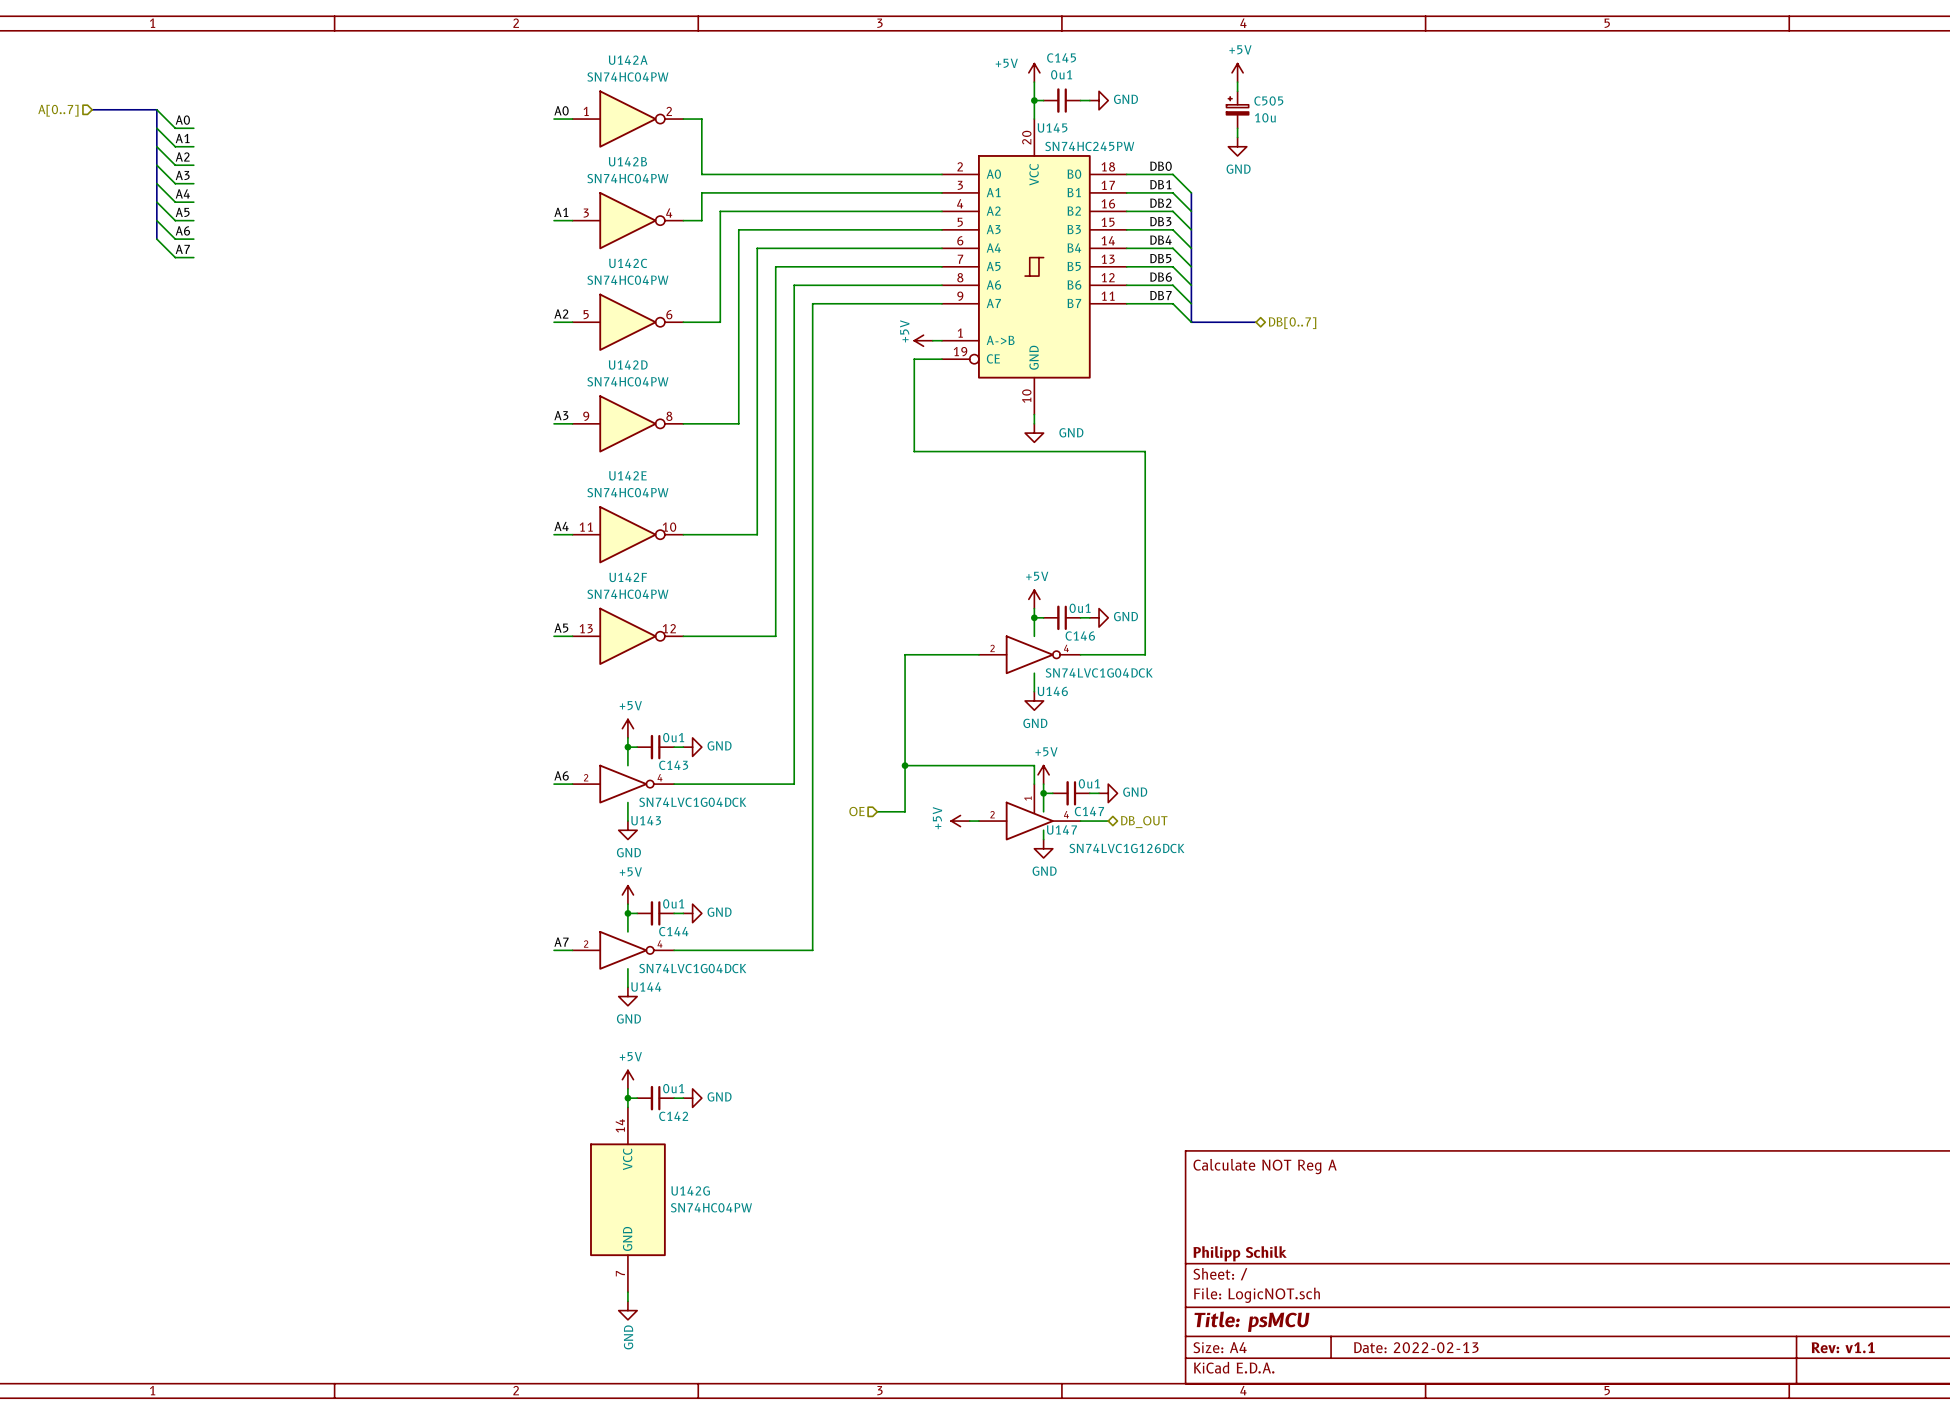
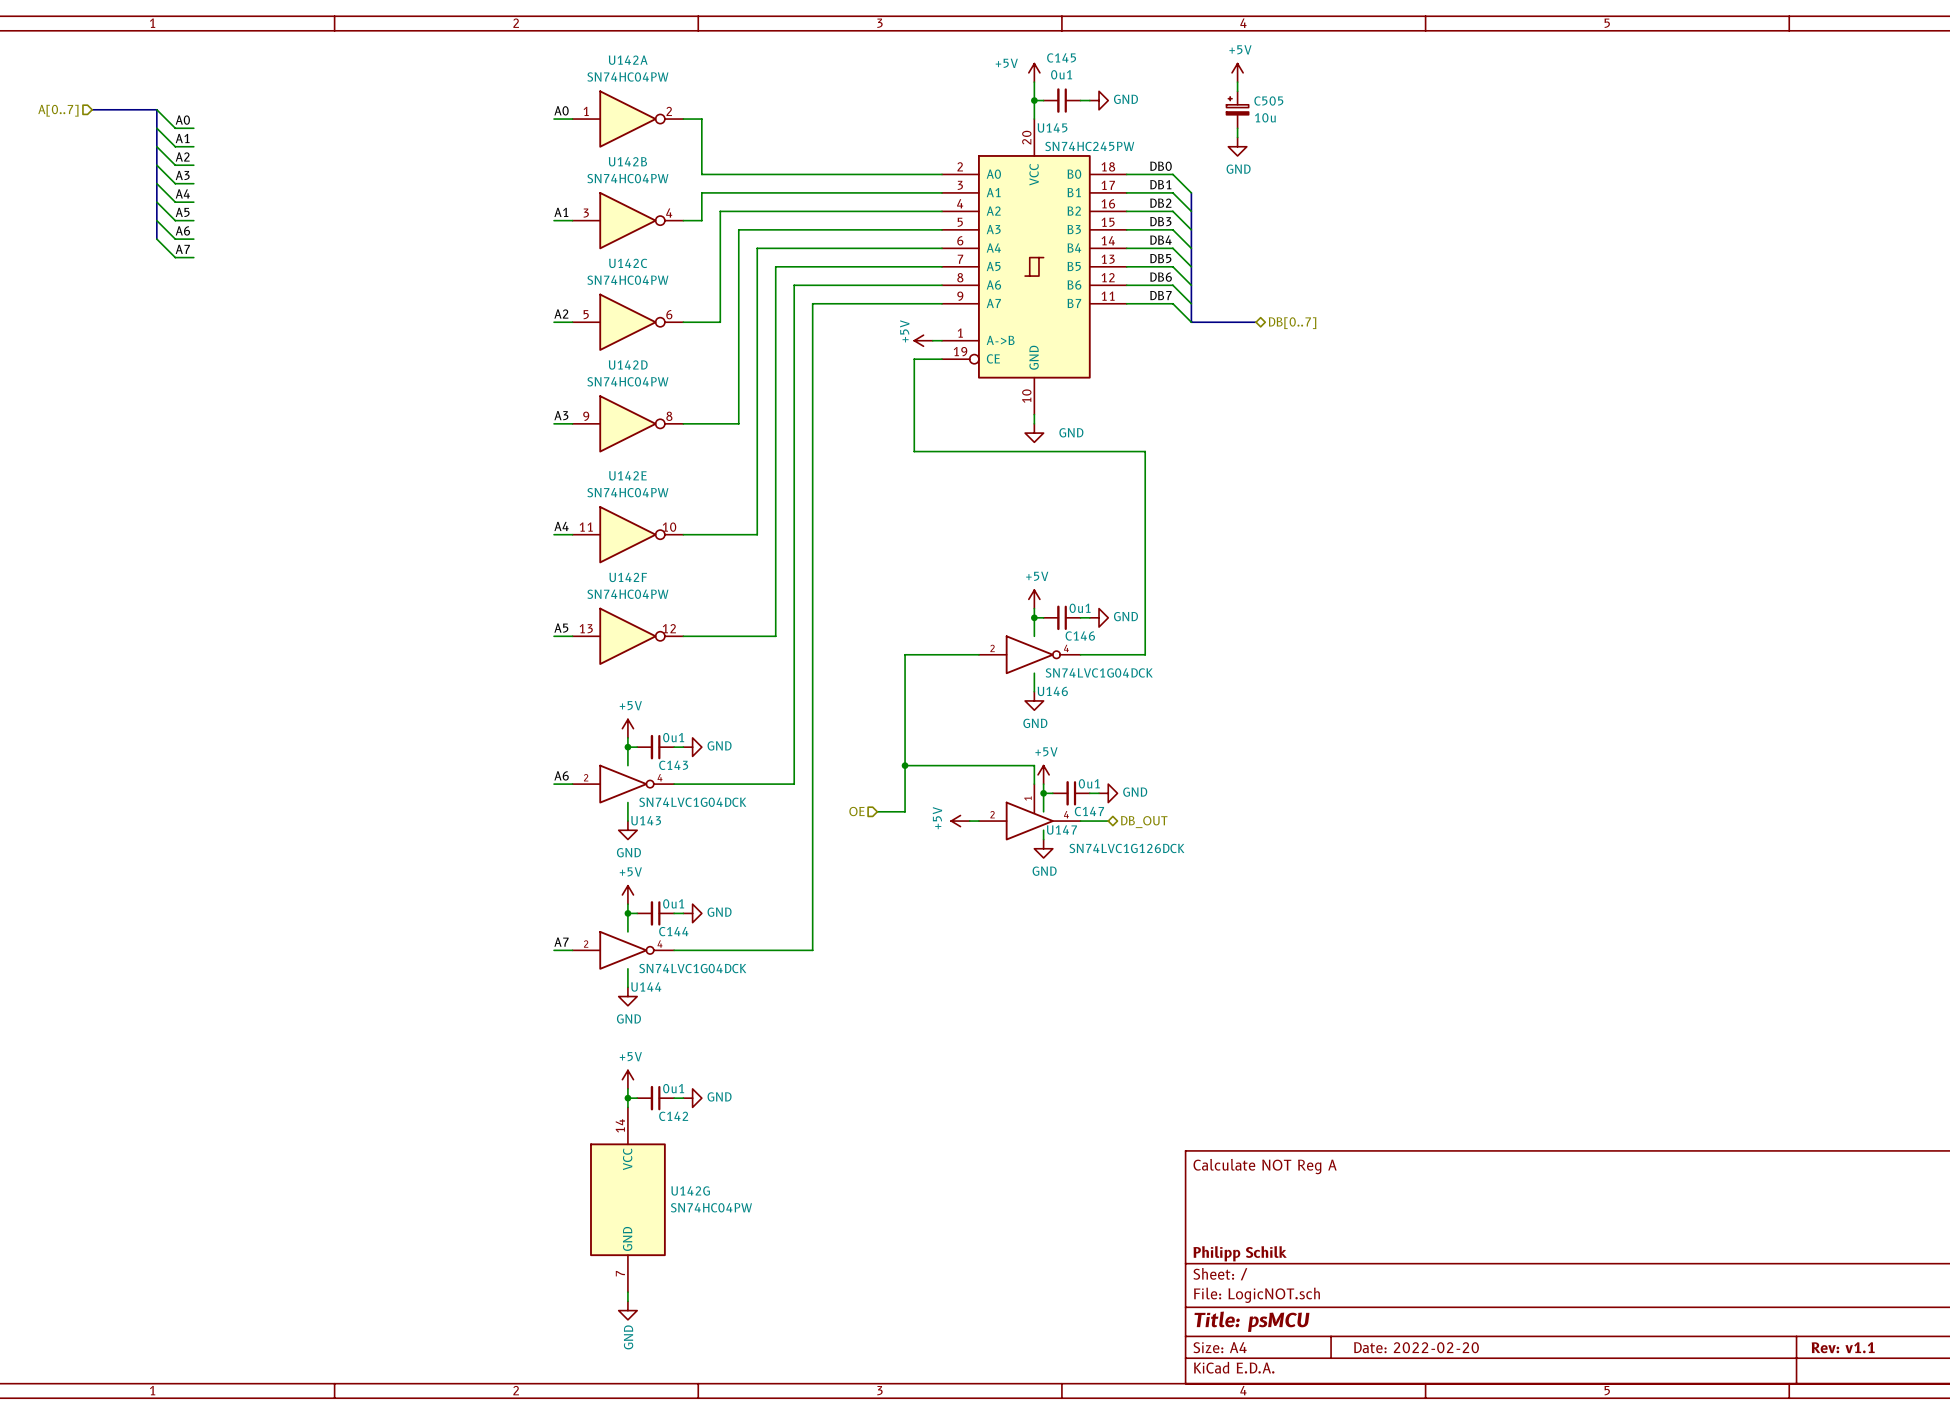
title block: Date: 2022-02-13 (1416, 1347) -> Date: 2022-02-20 (1416, 1347)

